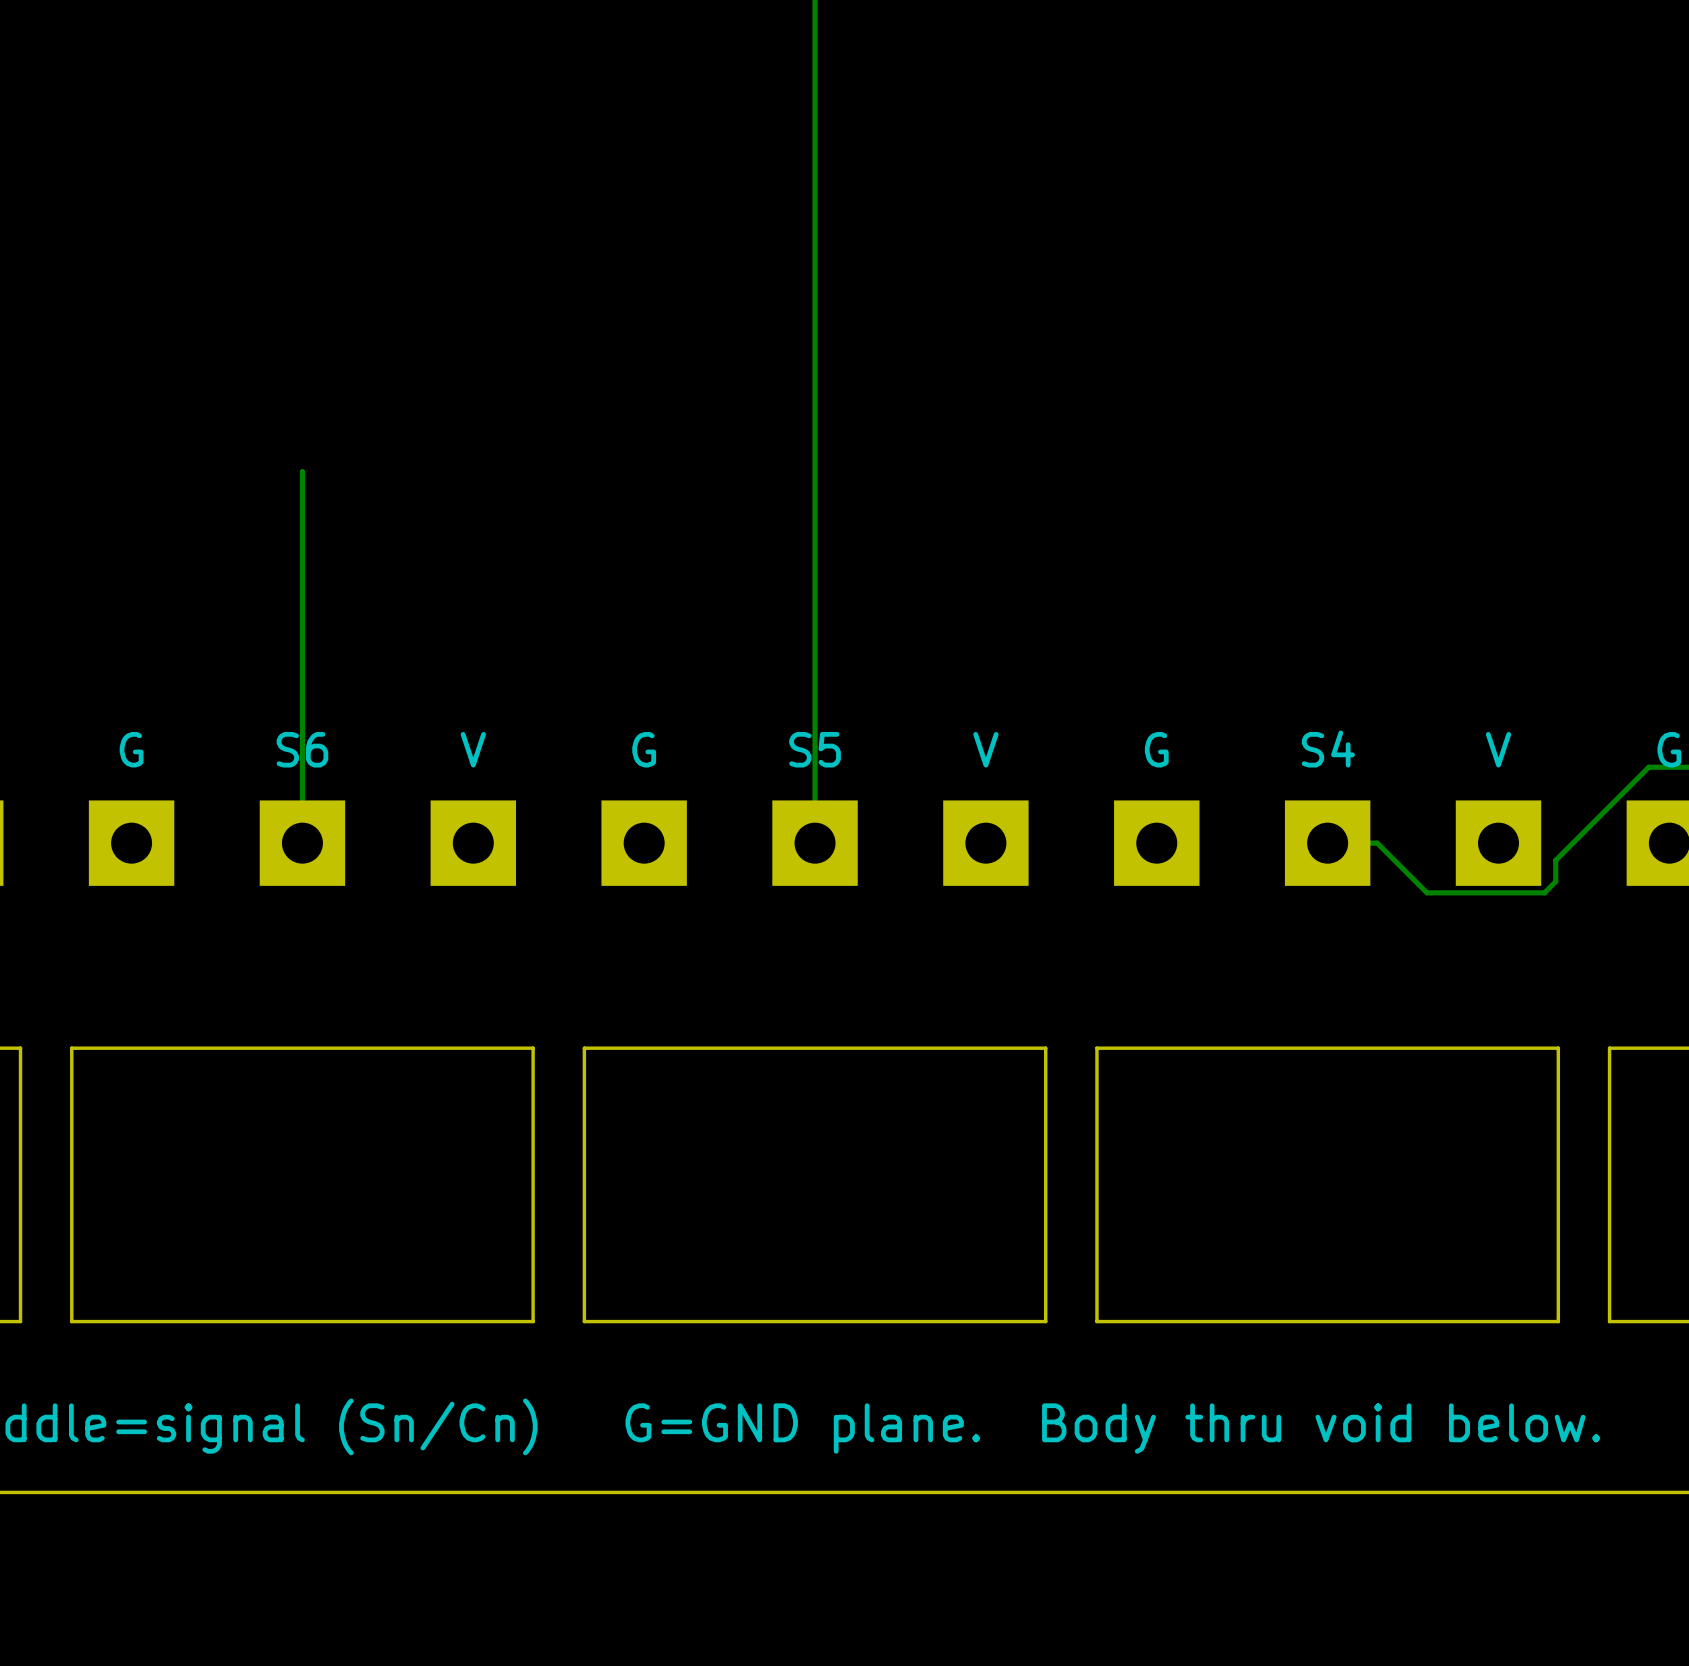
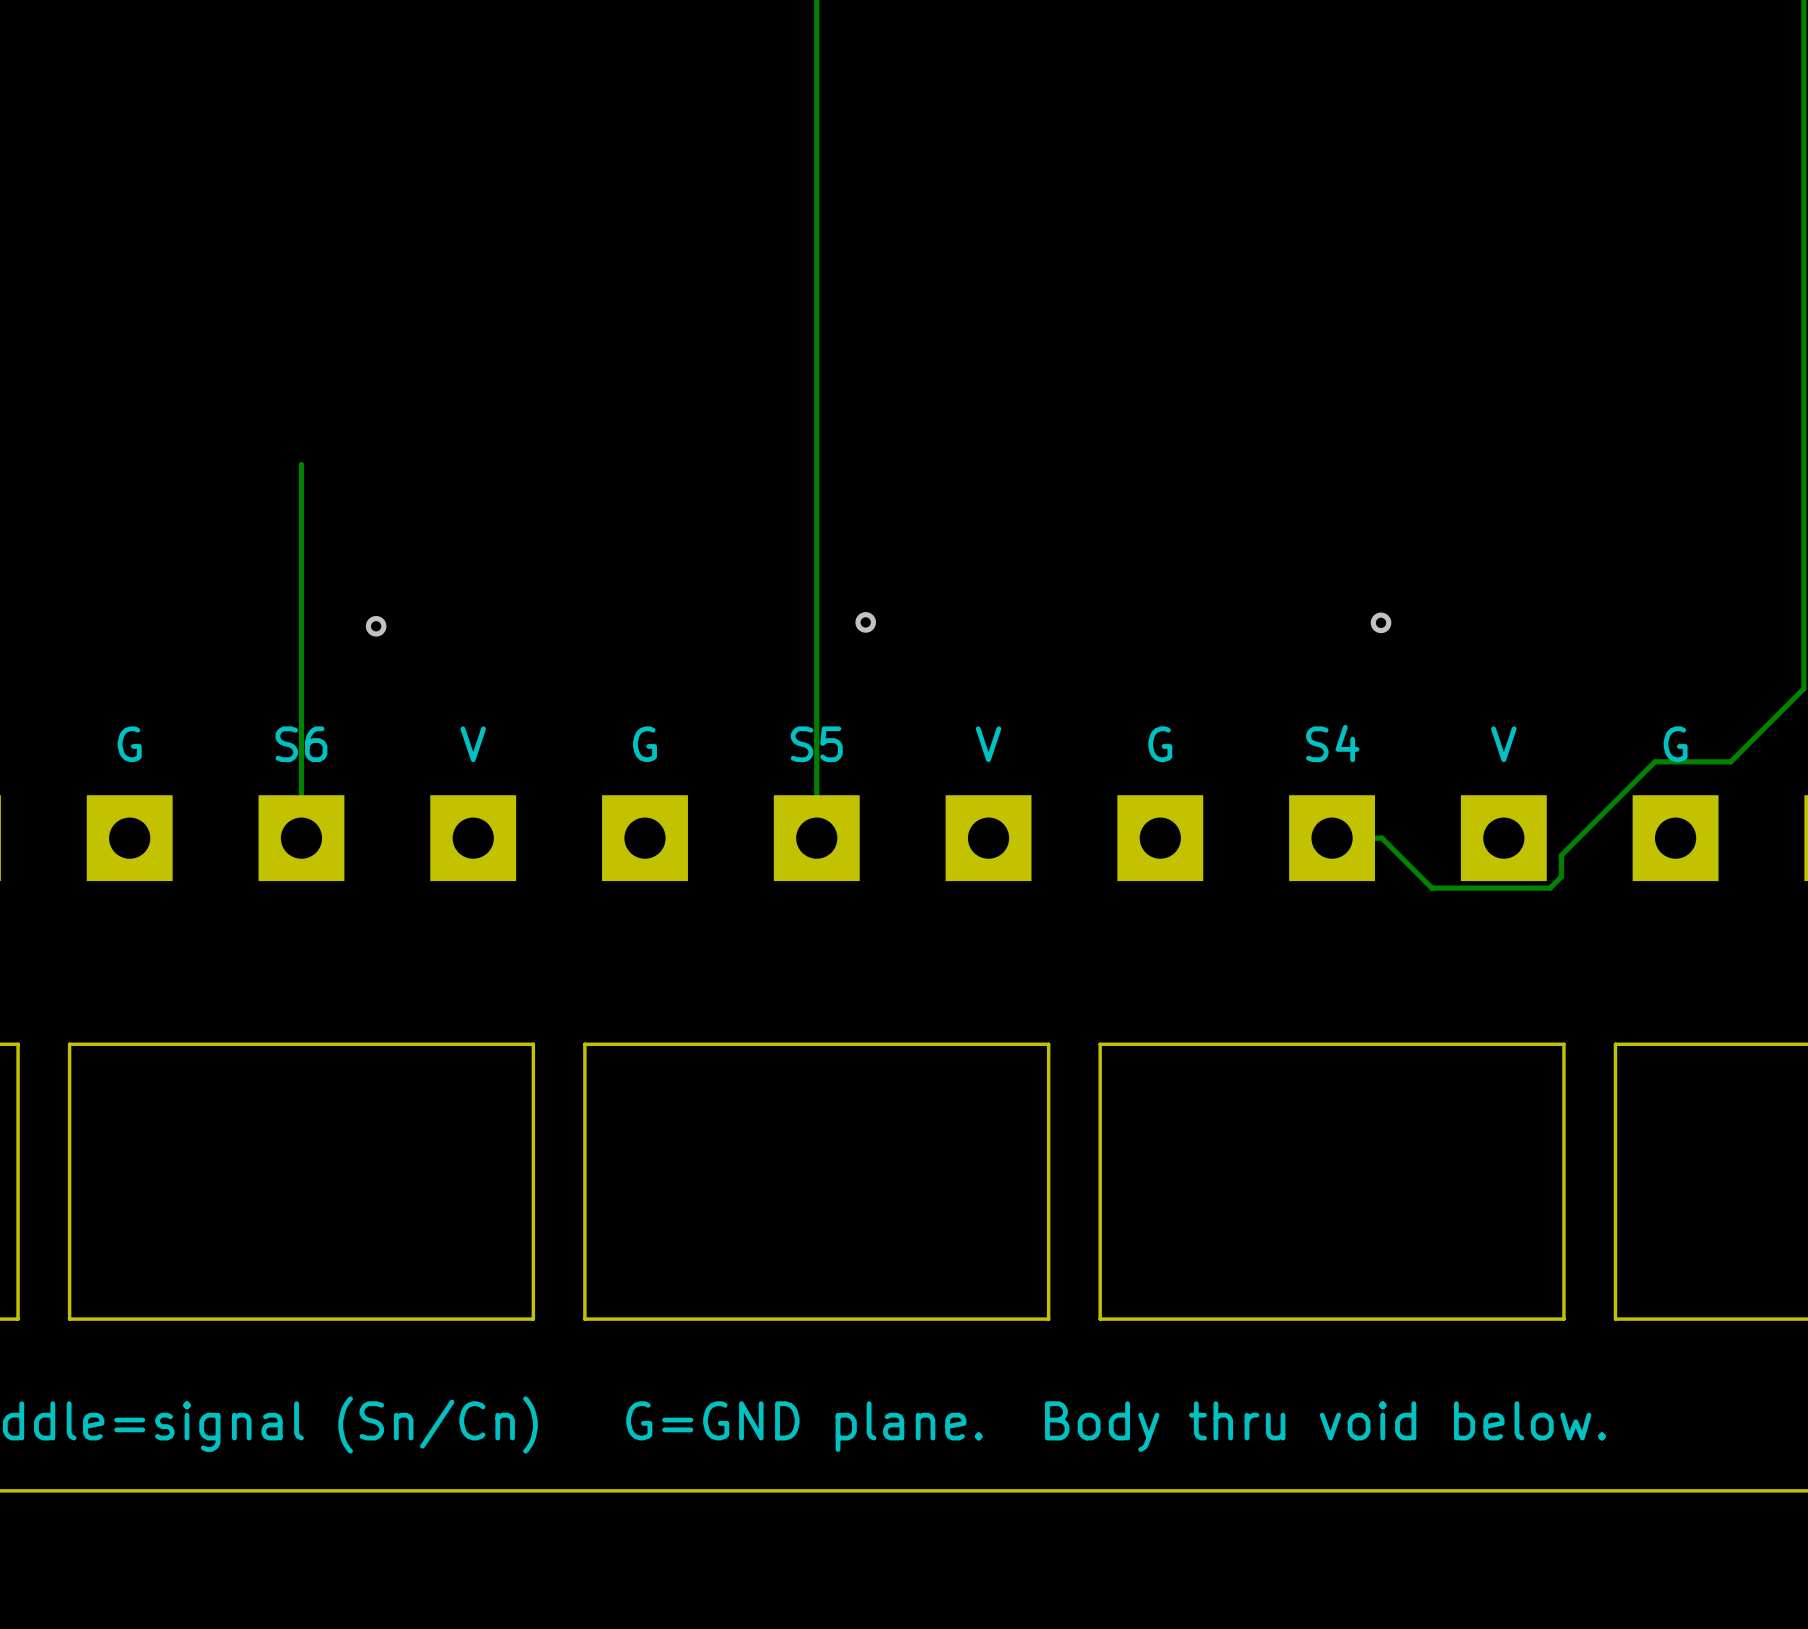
via: none -> (865, 622)
via: none -> (1381, 622)
via: none -> (376, 626)

